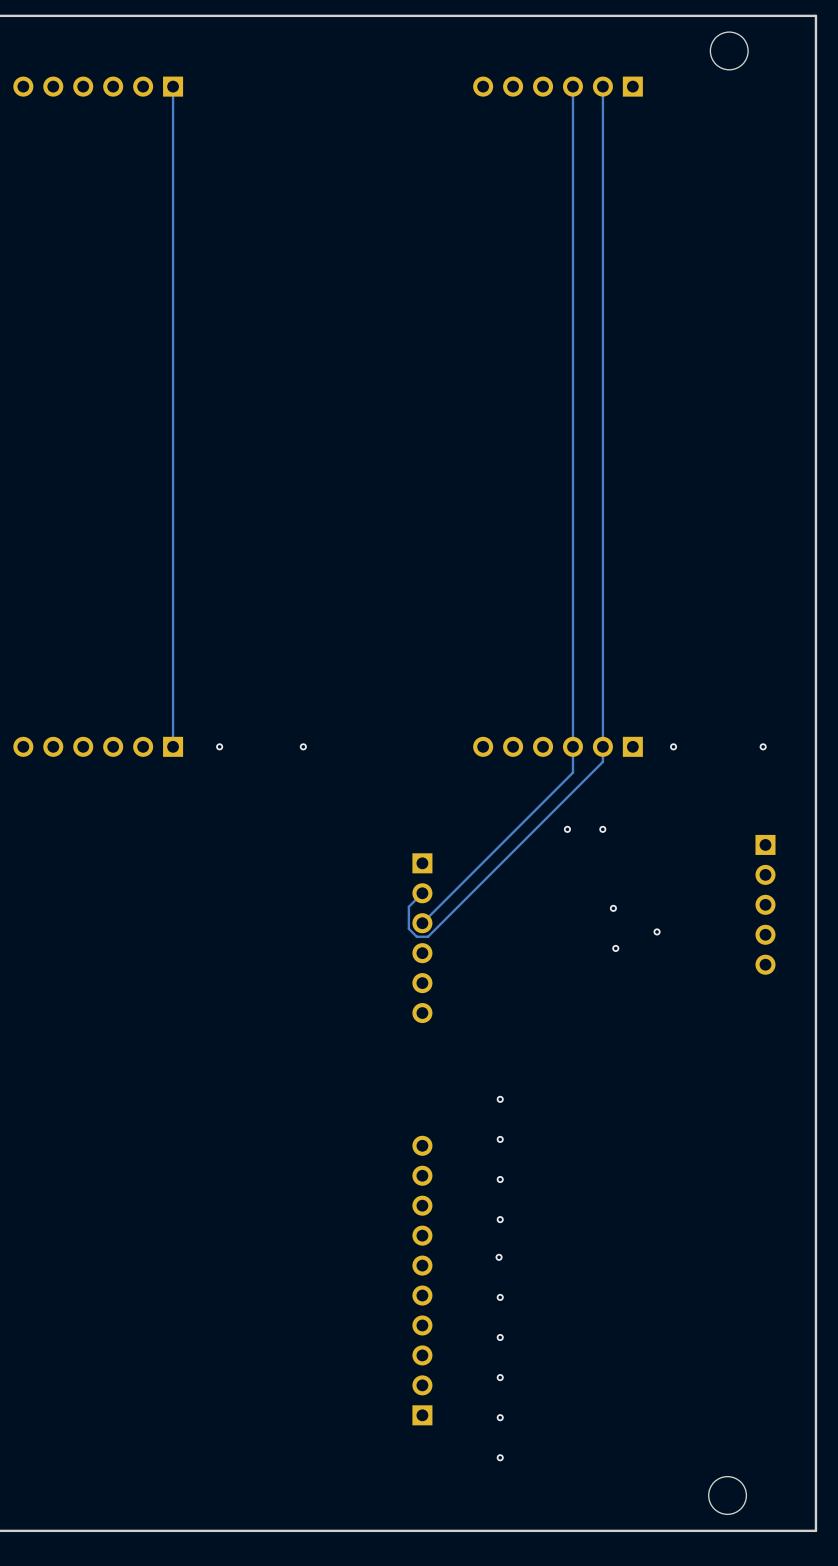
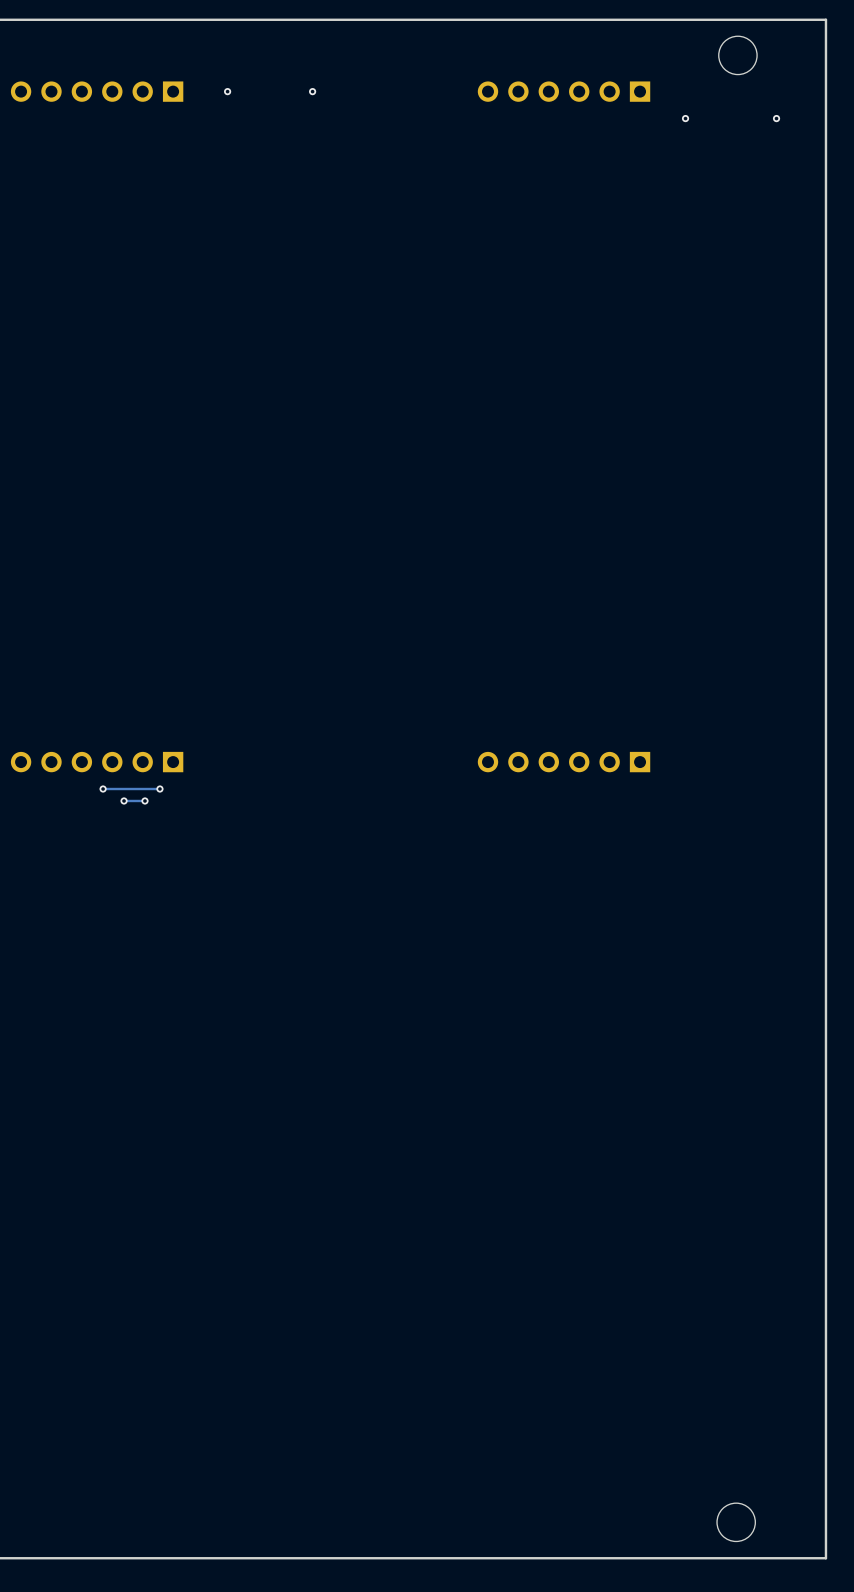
track: (173, 86) (173, 746) -> none
via: none -> (227, 91)
via: none -> (312, 91)
track: (572, 86) (572, 772) (422, 923) -> none
track: (602, 86) (602, 761) (428, 936) (416, 936) (408, 928) (408, 906) (422, 893) -> none
via: none -> (685, 118)
via: none -> (776, 118)
via: (219, 746) -> none
via: (303, 746) -> none
via: (673, 746) -> none
via: (763, 746) -> none
via: none -> (103, 789)
track: none -> (159, 789) (103, 789)
via: none -> (159, 789)
via: none -> (124, 800)
track: none -> (144, 800) (124, 800)
via: none -> (144, 800)
via: (567, 829) -> none
via: (602, 829) -> none
part: (765, 904) -> none
via: (613, 908) -> none
via: (657, 931) -> none
part: (422, 938) -> none
via: (615, 948) -> none
via: (500, 1099) -> none
via: (500, 1139) -> none
via: (500, 1179) -> none
via: (500, 1219) -> none
via: (499, 1257) -> none
part: (422, 1280) -> none
via: (500, 1297) -> none
via: (500, 1337) -> none
via: (500, 1377) -> none
via: (500, 1417) -> none
via: (500, 1457) -> none

